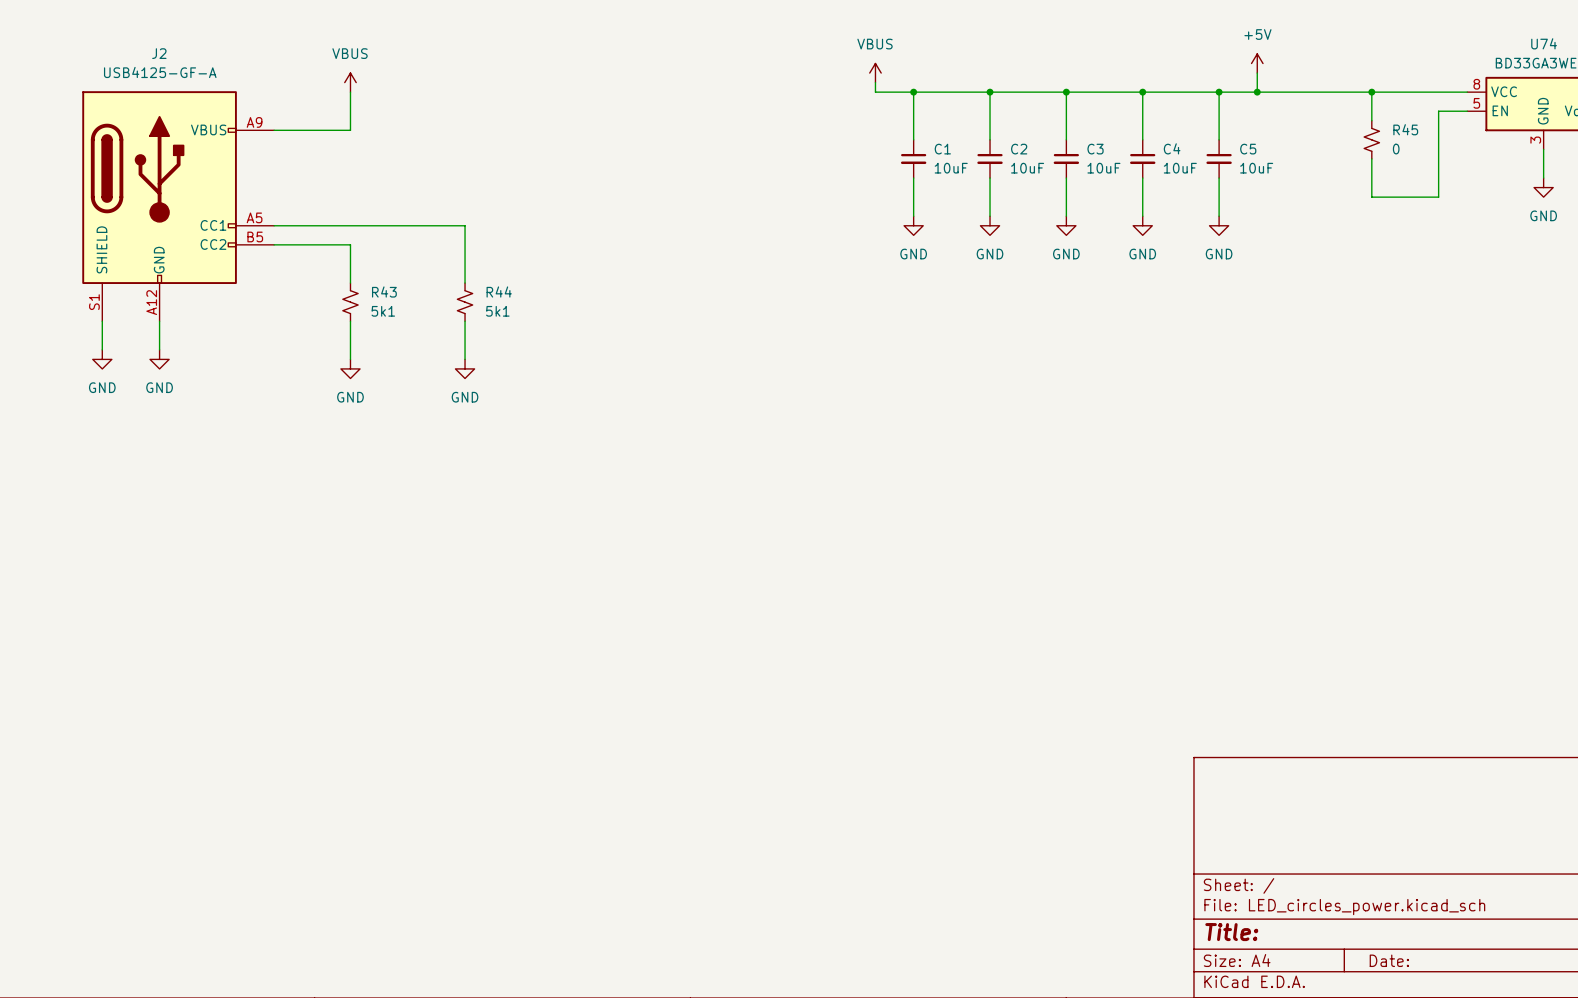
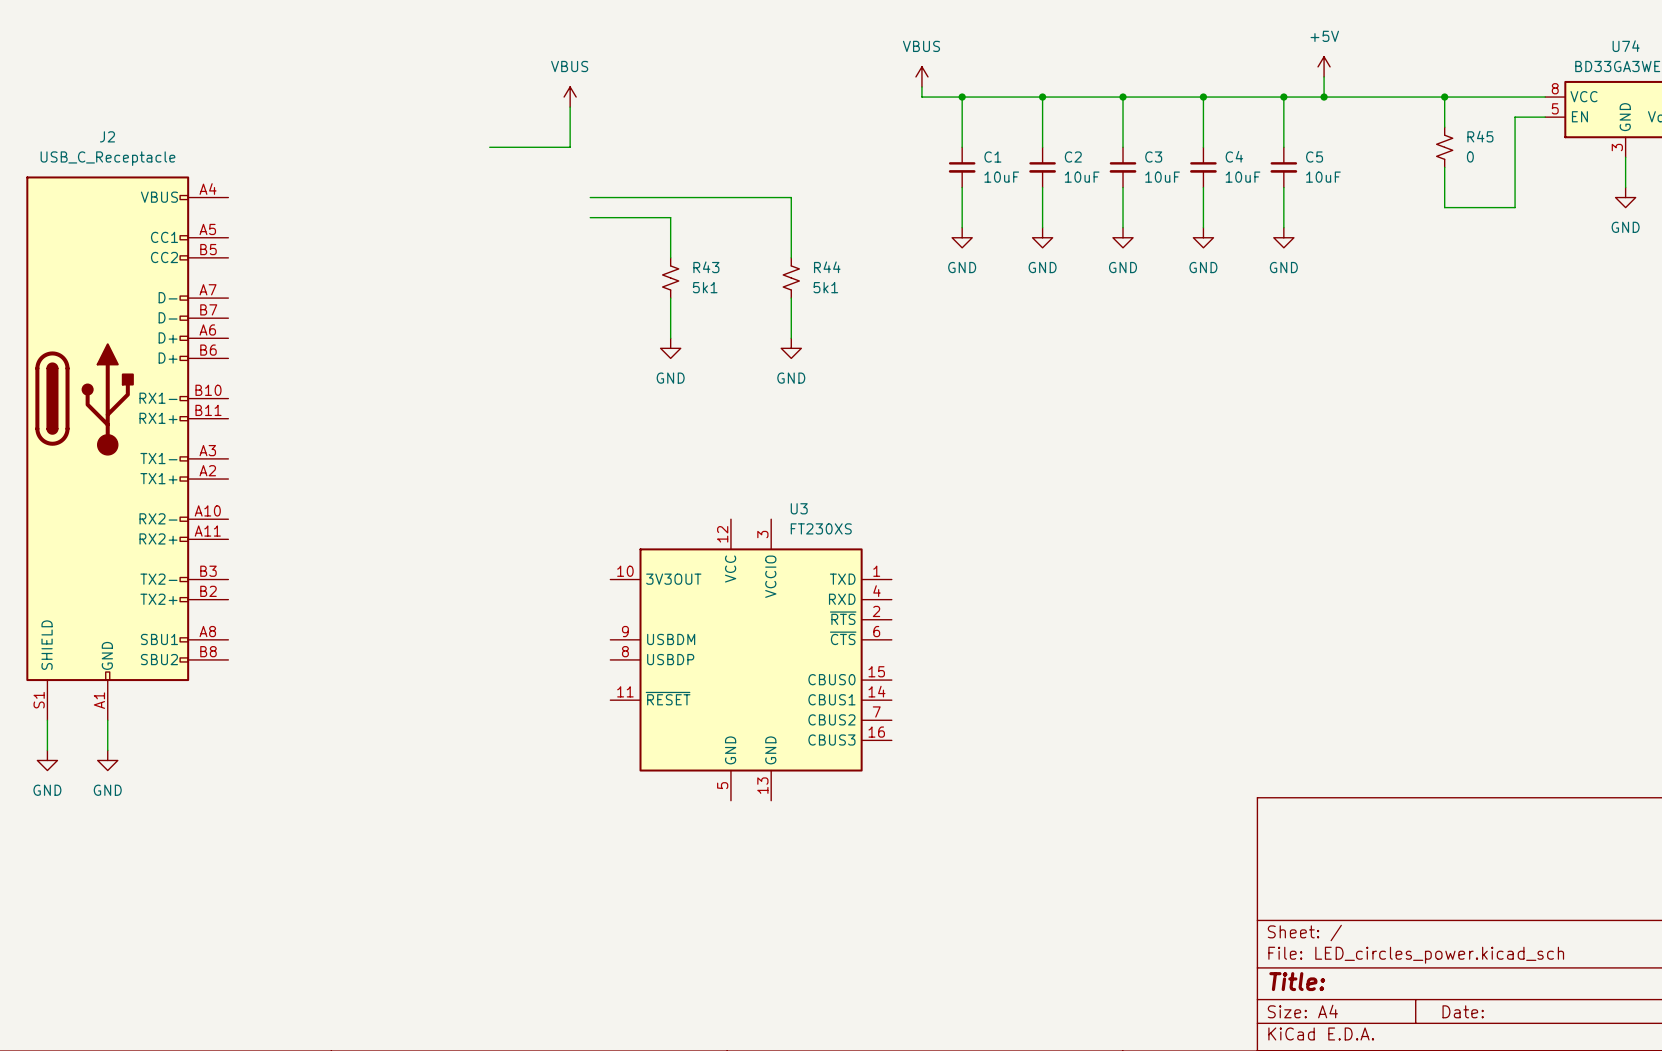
J2 name position: J2 (159, 53) -> J2 (107, 136)
J2 value: USB4125-GF-A (160, 72) -> USB_C_Receptacle (107, 158)
power symbol: VBUS (350, 82) -> none
J2 symbol: [82, 91, 275, 322] -> [26, 176, 229, 721]
wire: (350, 92) (350, 130) (274, 130) -> none
power symbol: none -> VBUS (570, 97)
wire: none -> (570, 107) (570, 147) (489, 147)
wire: none -> (590, 197) (791, 197) (791, 257)
wire: none -> (590, 217) (670, 217) (670, 257)
wire: (274, 225) (465, 225) (465, 283) -> none
wire: (274, 244) (350, 244) (350, 283) -> none
wire: none -> (791, 298) (791, 338)
R43 position: (350, 302) -> (670, 277)
R44 position: (465, 302) -> (791, 277)
wire: (350, 321) (350, 359) -> none
wire: (465, 321) (465, 359) -> (670, 298) (670, 338)
power symbol: none -> GND (670, 348)
power symbol: none -> GND (791, 348)
power symbol: GND (102, 359) -> none
power symbol: GND (159, 359) -> none
power symbol: GND (350, 368) -> none
power symbol: GND (465, 368) -> none
U3: none -> FT230XS (751, 659)
wire: none -> (47, 720) (47, 750)
wire: none -> (107, 720) (107, 750)
power symbol: none -> GND (47, 760)
power symbol: none -> GND (107, 760)

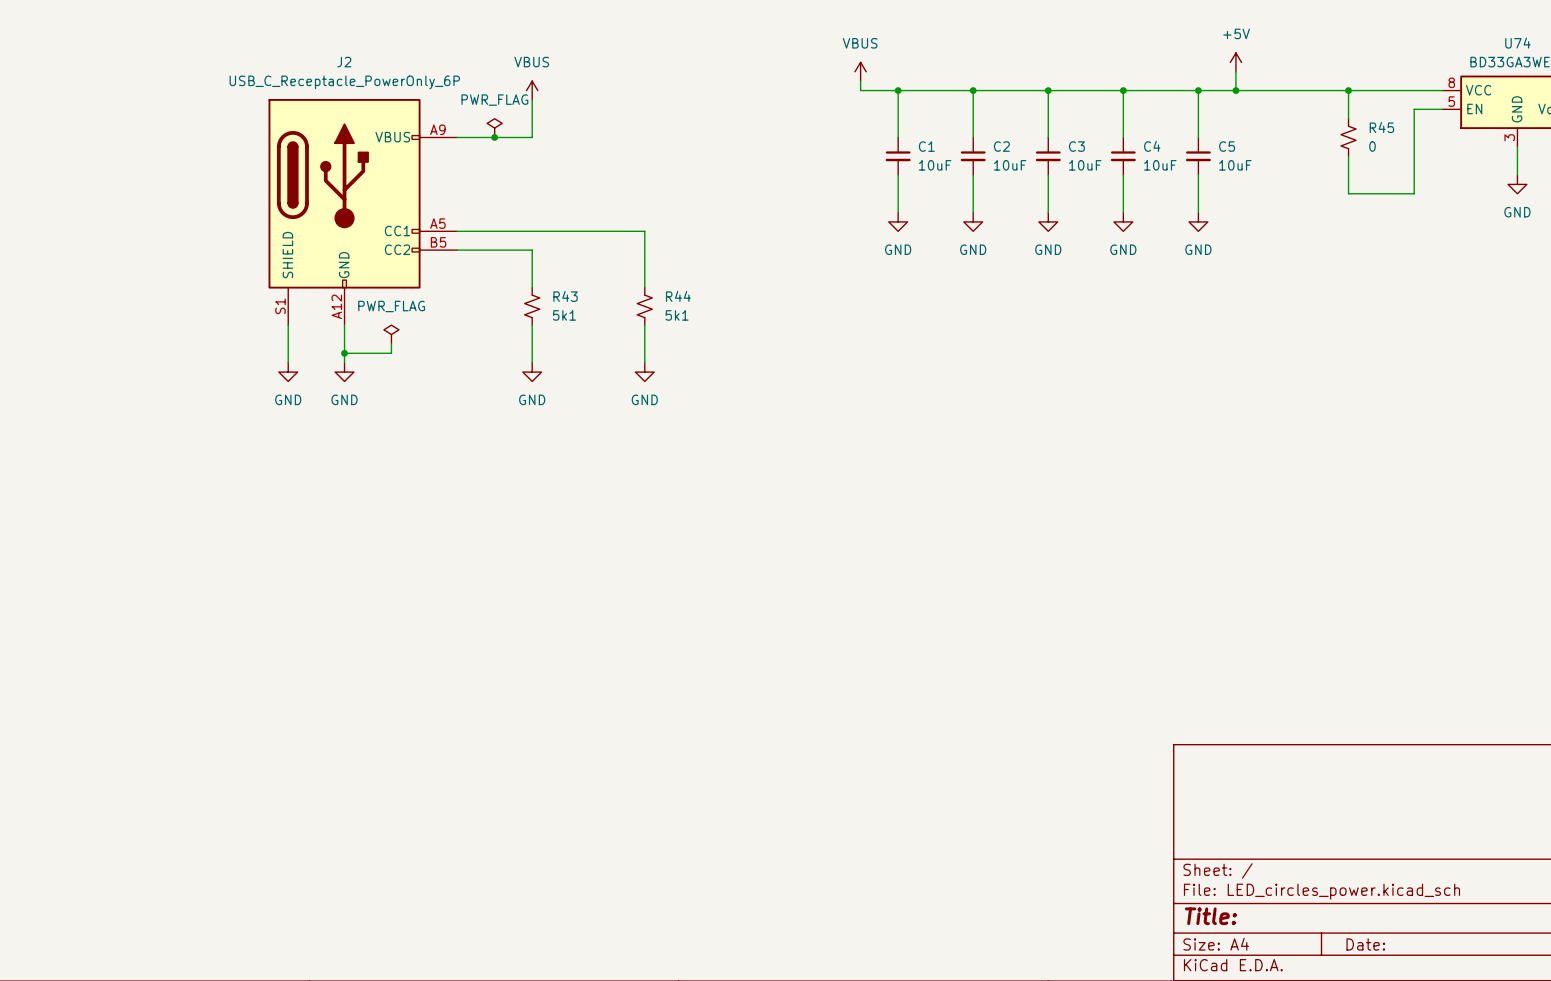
J2 name position: J2 (107, 136) -> J2 (344, 62)
power symbol: none -> PWR_FLAG (494, 128)
junction: none -> (494, 137)
J2 value: USB_C_Receptacle (107, 158) -> USB_C_Receptacle_PowerOnly_6P (344, 82)
J2 symbol: [26, 176, 229, 721] -> [268, 99, 458, 326]
wire: (590, 197) (791, 197) (791, 257) -> (457, 231) (644, 231) (644, 287)
wire: (590, 217) (670, 217) (670, 257) -> (457, 250) (532, 250) (532, 287)
R43 position: (670, 277) -> (532, 306)
R44 position: (791, 277) -> (644, 306)
wire: (670, 298) (670, 338) -> (532, 325) (532, 362)
wire: (791, 298) (791, 338) -> (644, 325) (644, 362)
wire: none -> (288, 325) (288, 362)
wire: none -> (344, 325) (344, 362)
power symbol position: GND (670, 348) -> GND (644, 372)
power symbol: GND (791, 348) -> none
power symbol: none -> PWR_FLAG (391, 334)
wire: none -> (391, 343) (391, 353) (344, 353)
junction: none -> (344, 353)
power symbol: none -> GND (288, 372)
power symbol: none -> GND (344, 372)
power symbol: none -> GND (532, 372)
U3: FT230XS (751, 659) -> none
wire: (47, 720) (47, 750) -> none
wire: (107, 720) (107, 750) -> none
power symbol: GND (47, 760) -> none
power symbol: GND (107, 760) -> none

